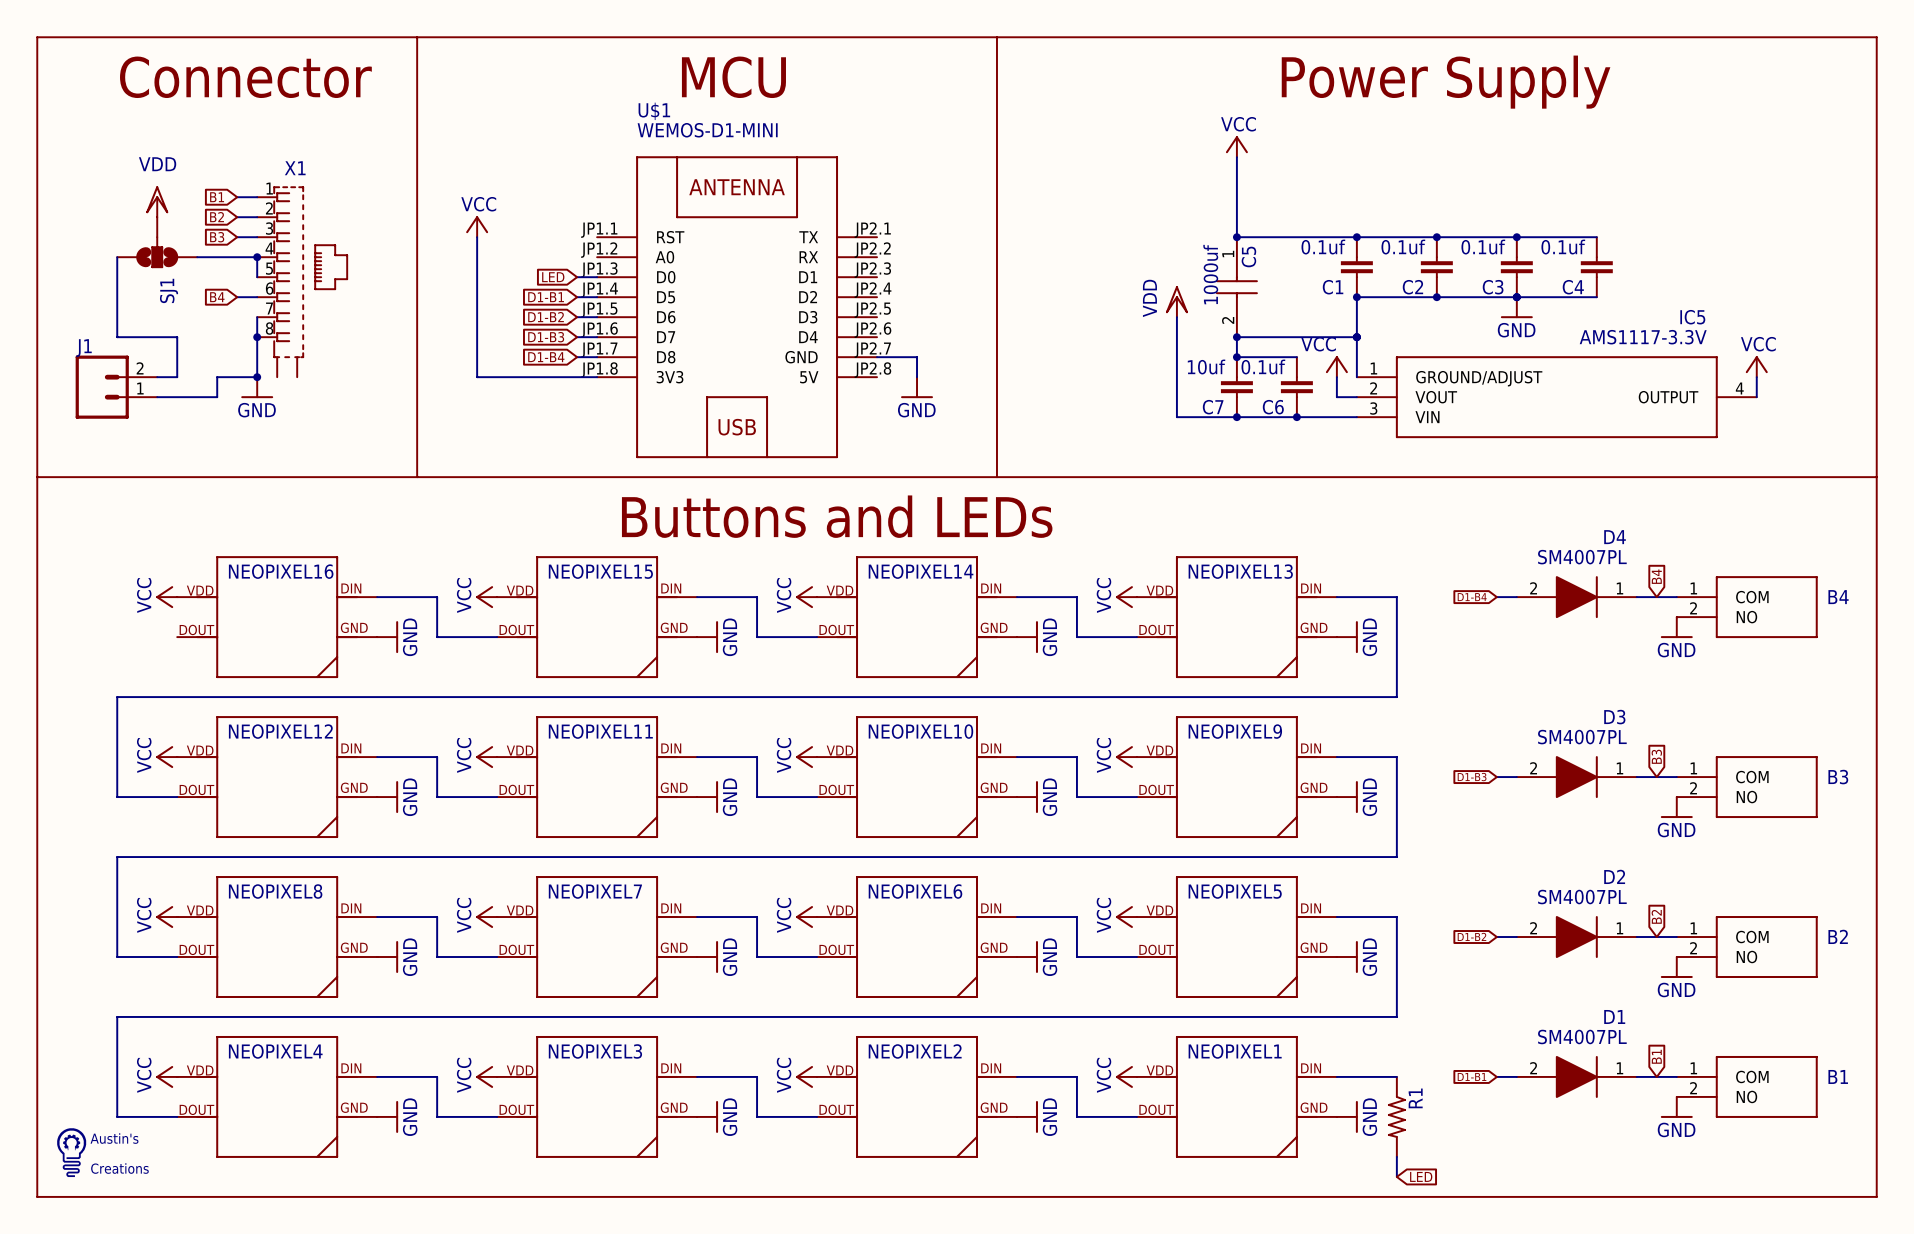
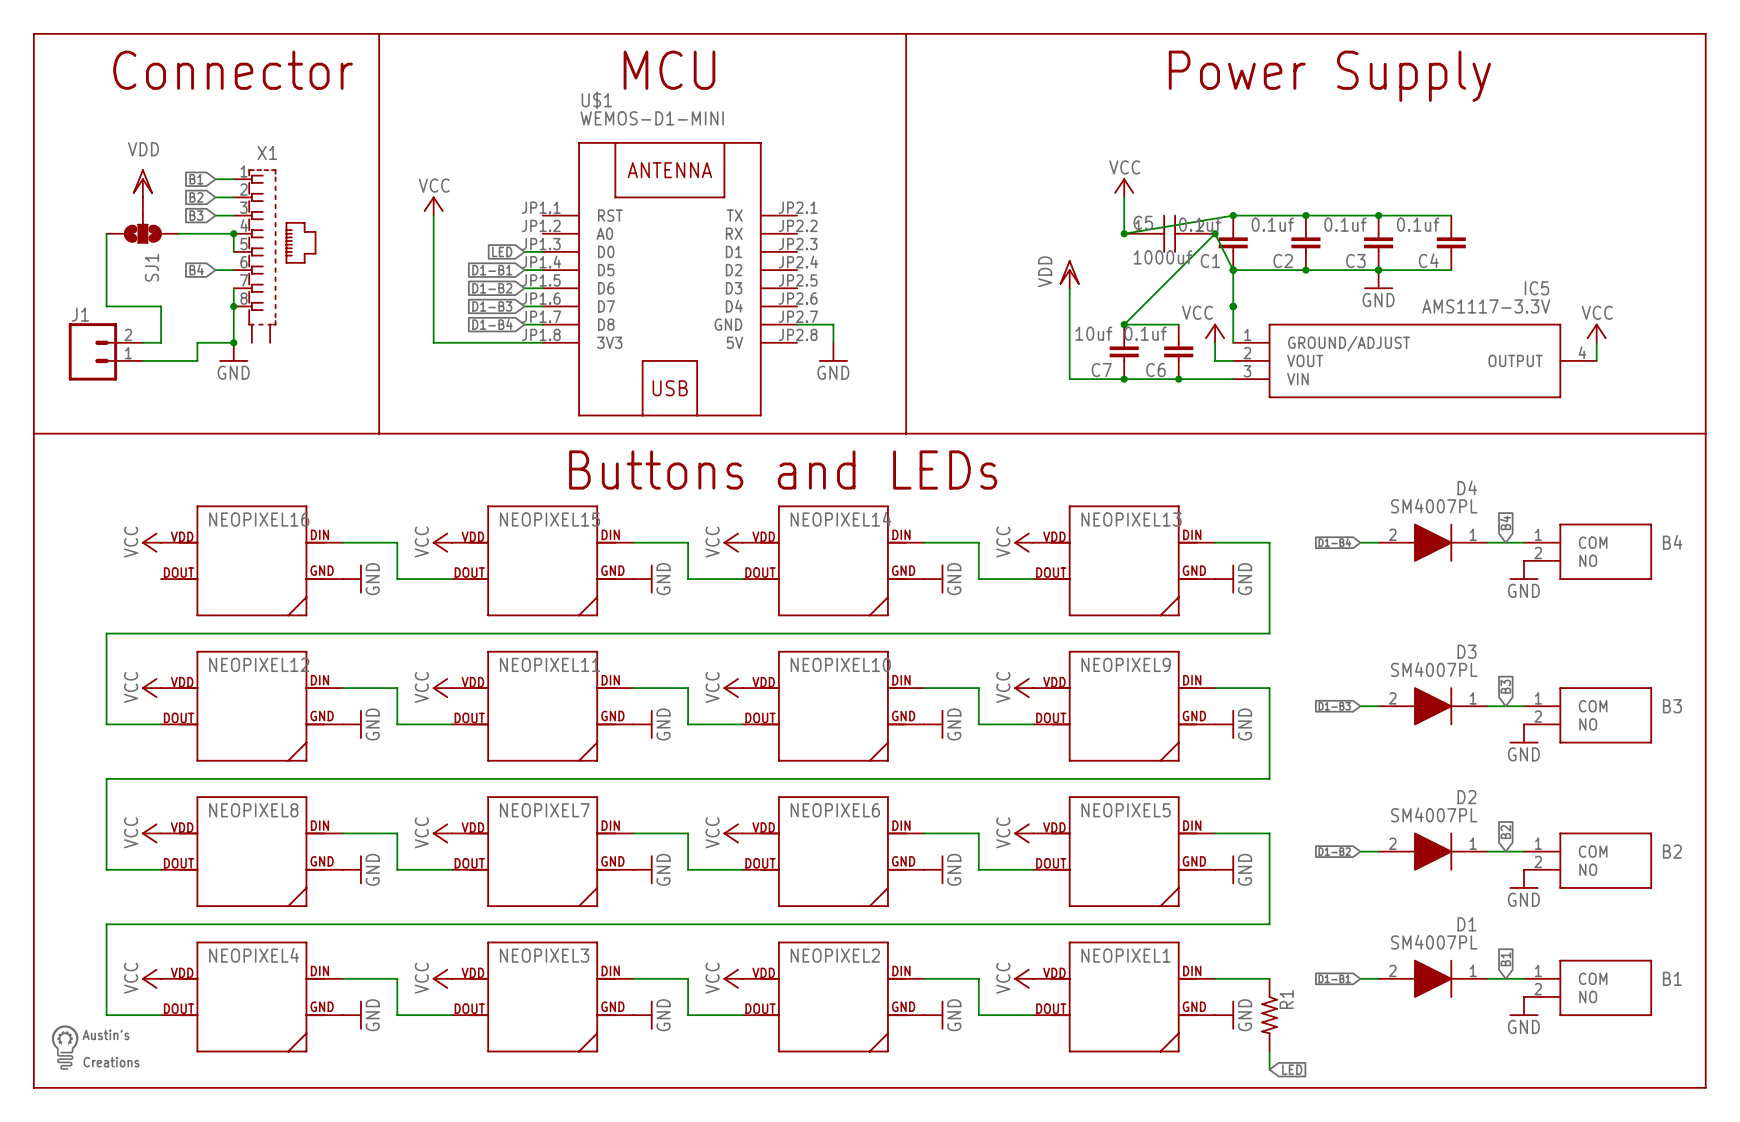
power symbol position: VCC (1236, 146) -> VCC (1124, 187)
wire: (1236, 157) (1236, 217) -> none
wire: (1236, 237) (1356, 237) -> (1124, 215) (1124, 233) (1233, 215)
junction position: (1236, 237) -> (1124, 233)
junction: none -> (1215, 233)
C5 rotation: 0° (1236, 287) -> 90° counterclockwise (1169, 233)
junction: (1236, 337) -> none
wire: (1356, 337) (1236, 337) (1236, 357) -> (1233, 270) (1215, 233) (1124, 324)

